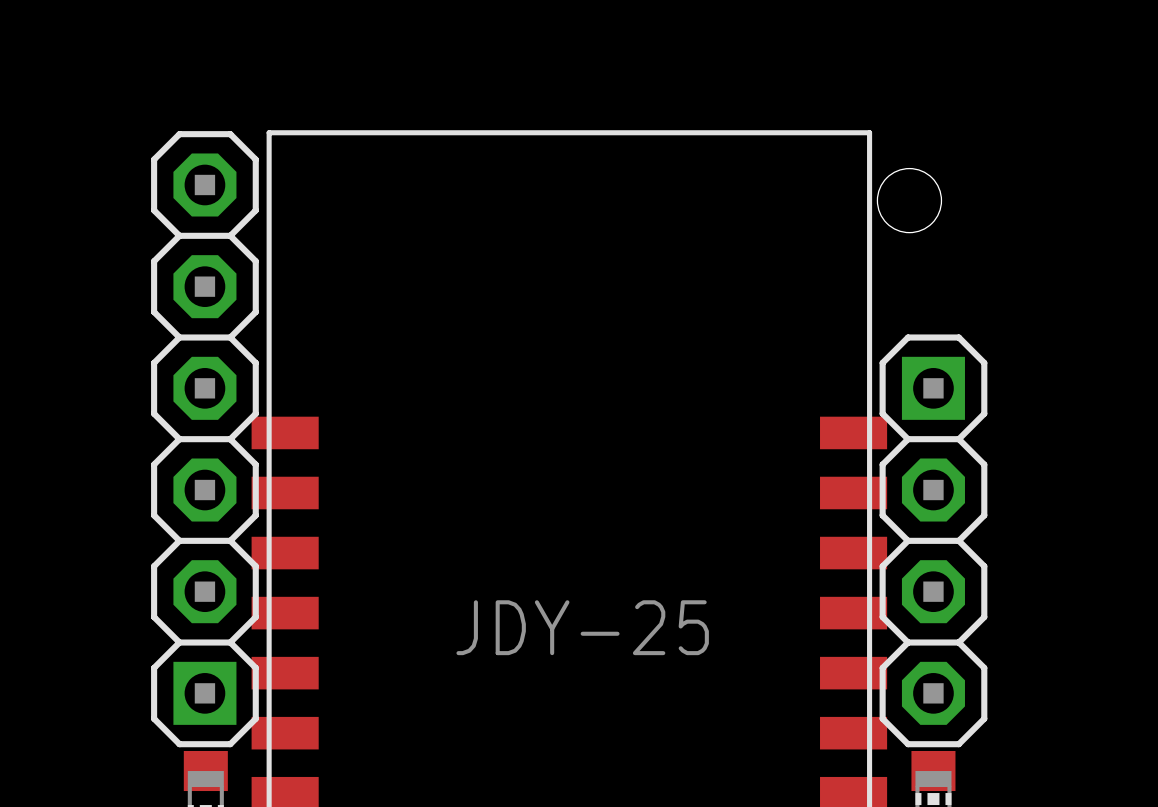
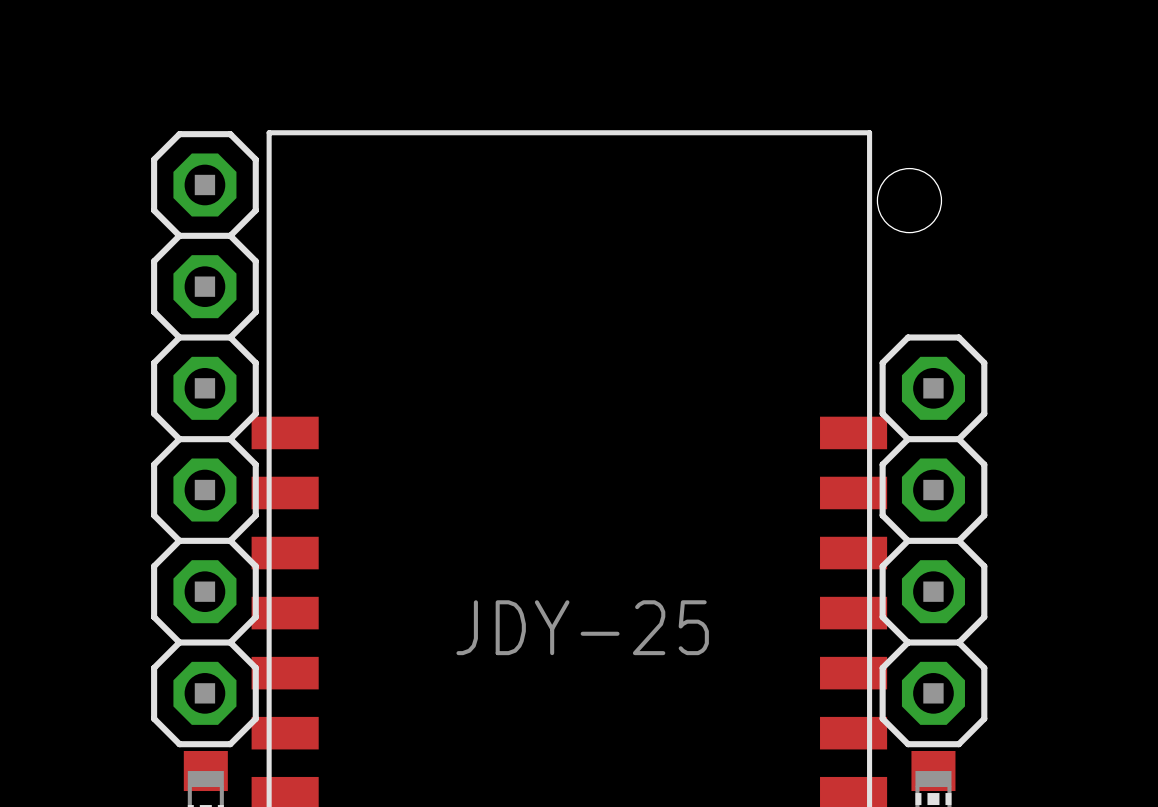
part footprint: [151, 131, 259, 748] -> [151, 131, 259, 748]
part footprint: [879, 334, 988, 748] -> [879, 334, 988, 748]

